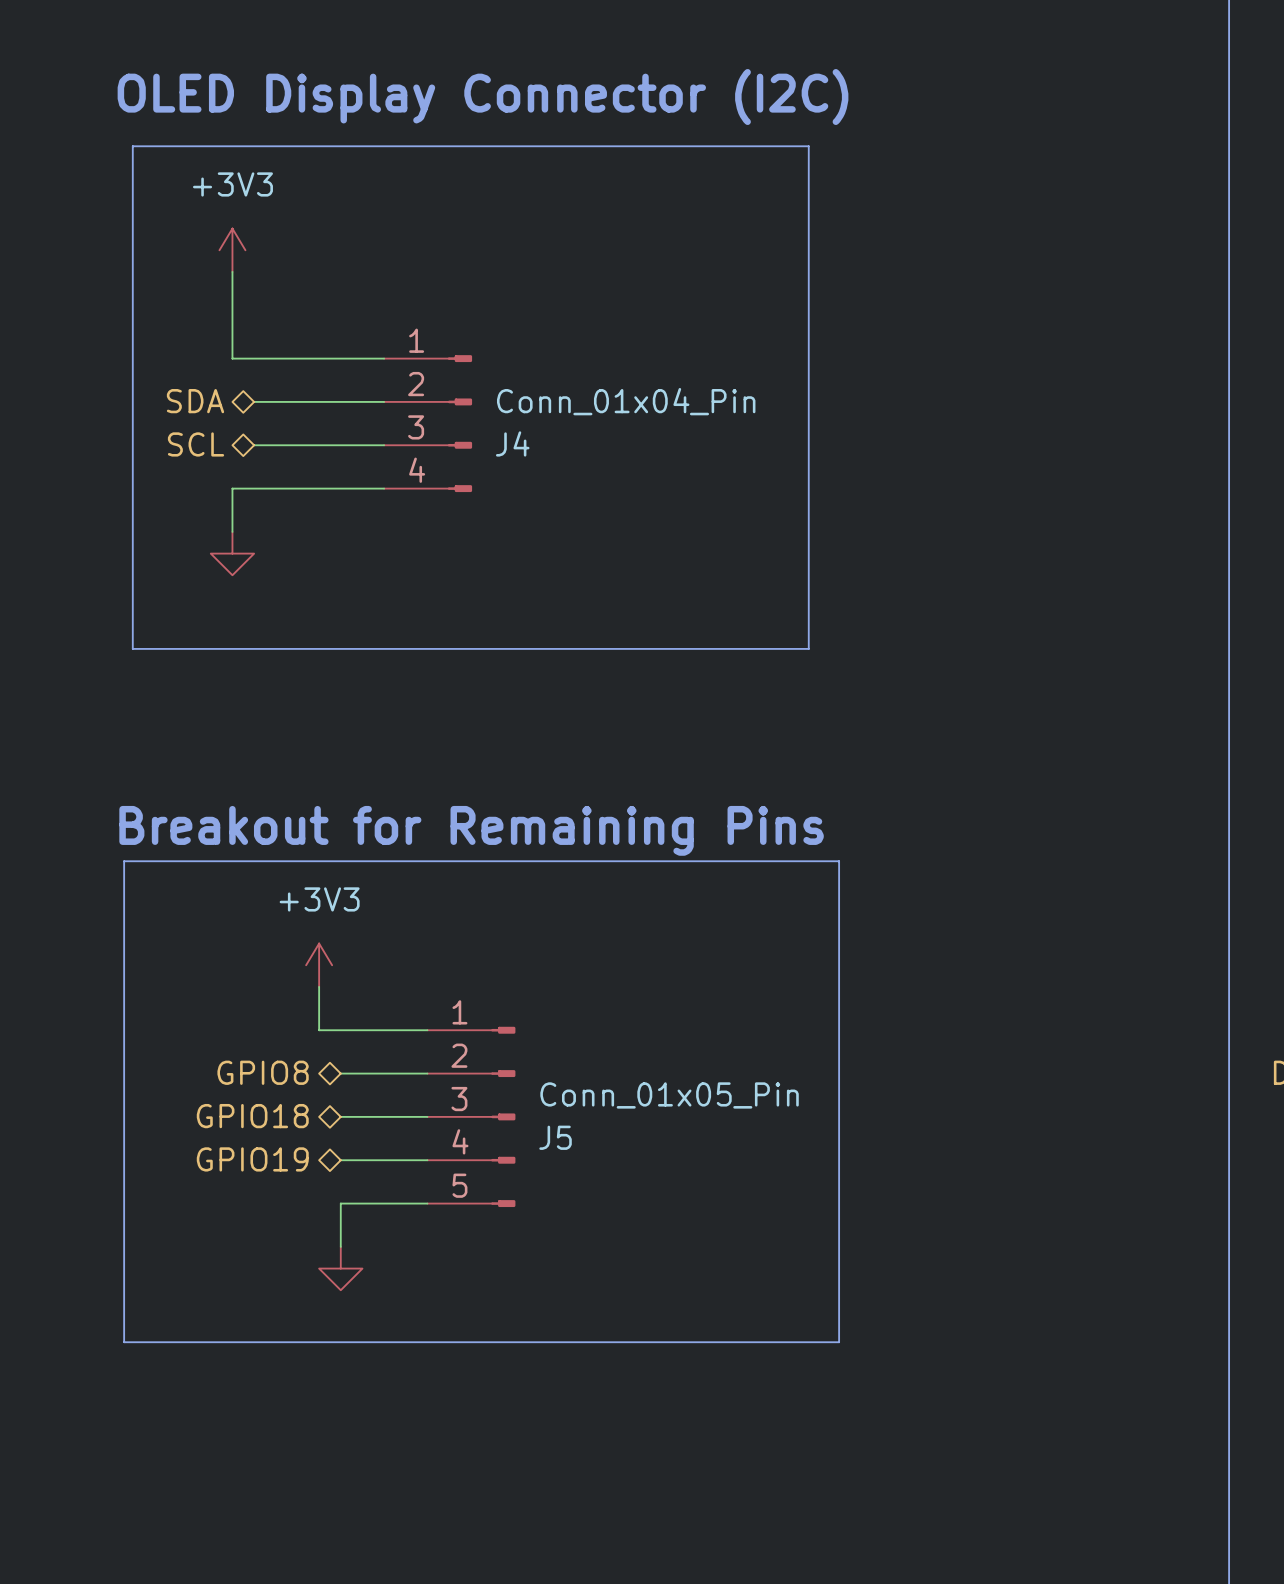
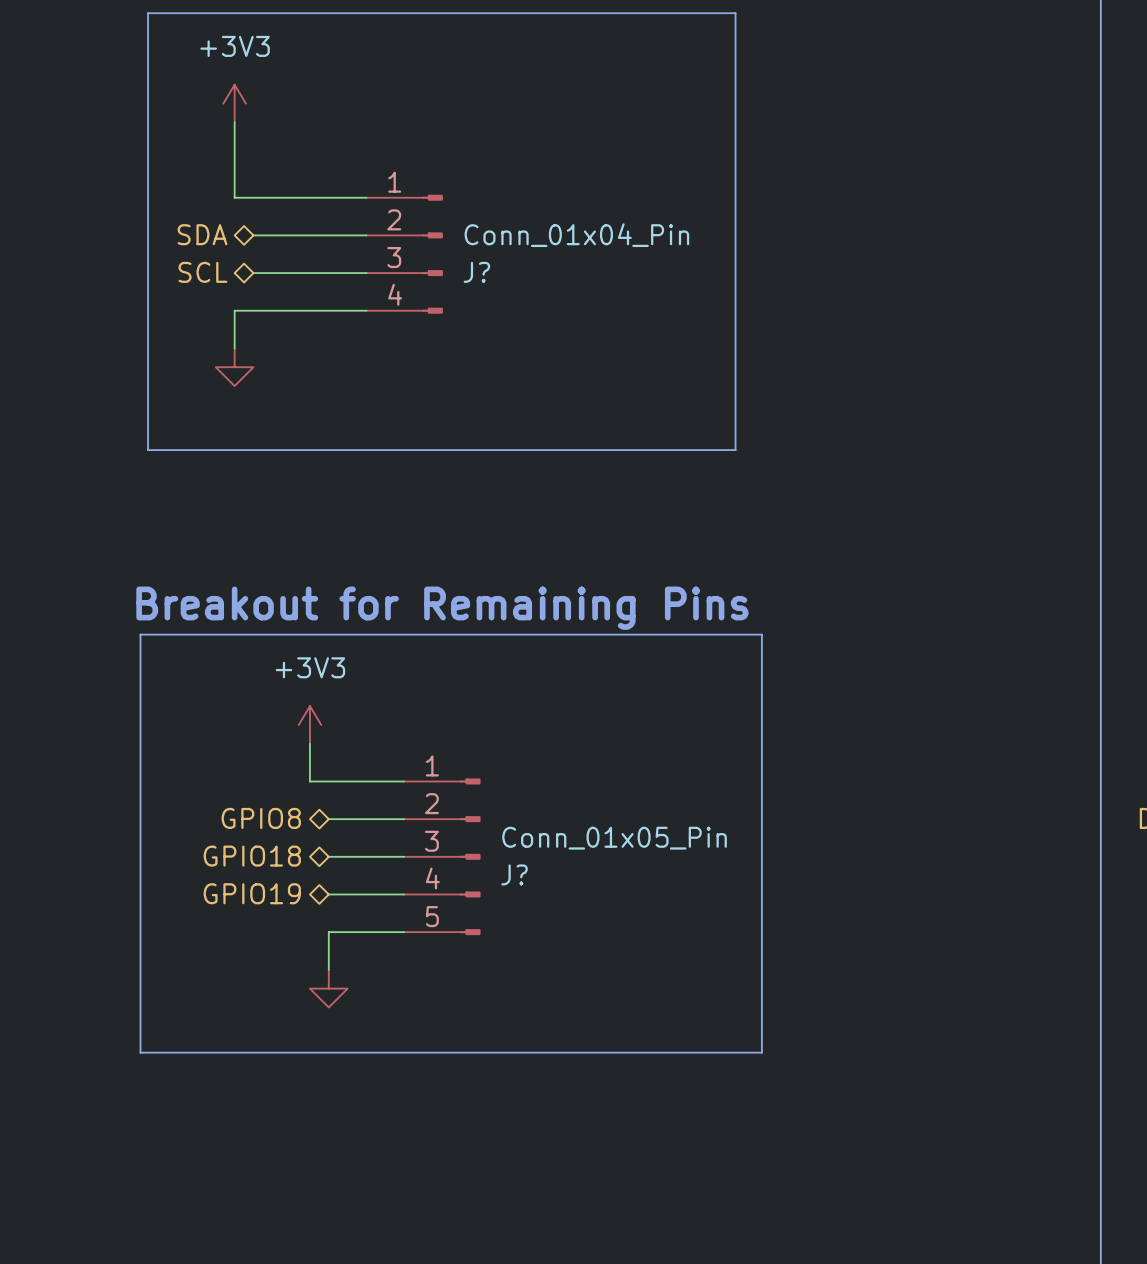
J4 name: J4 (512, 443) -> J? (476, 272)
J5 name: J5 (555, 1137) -> J? (514, 874)

